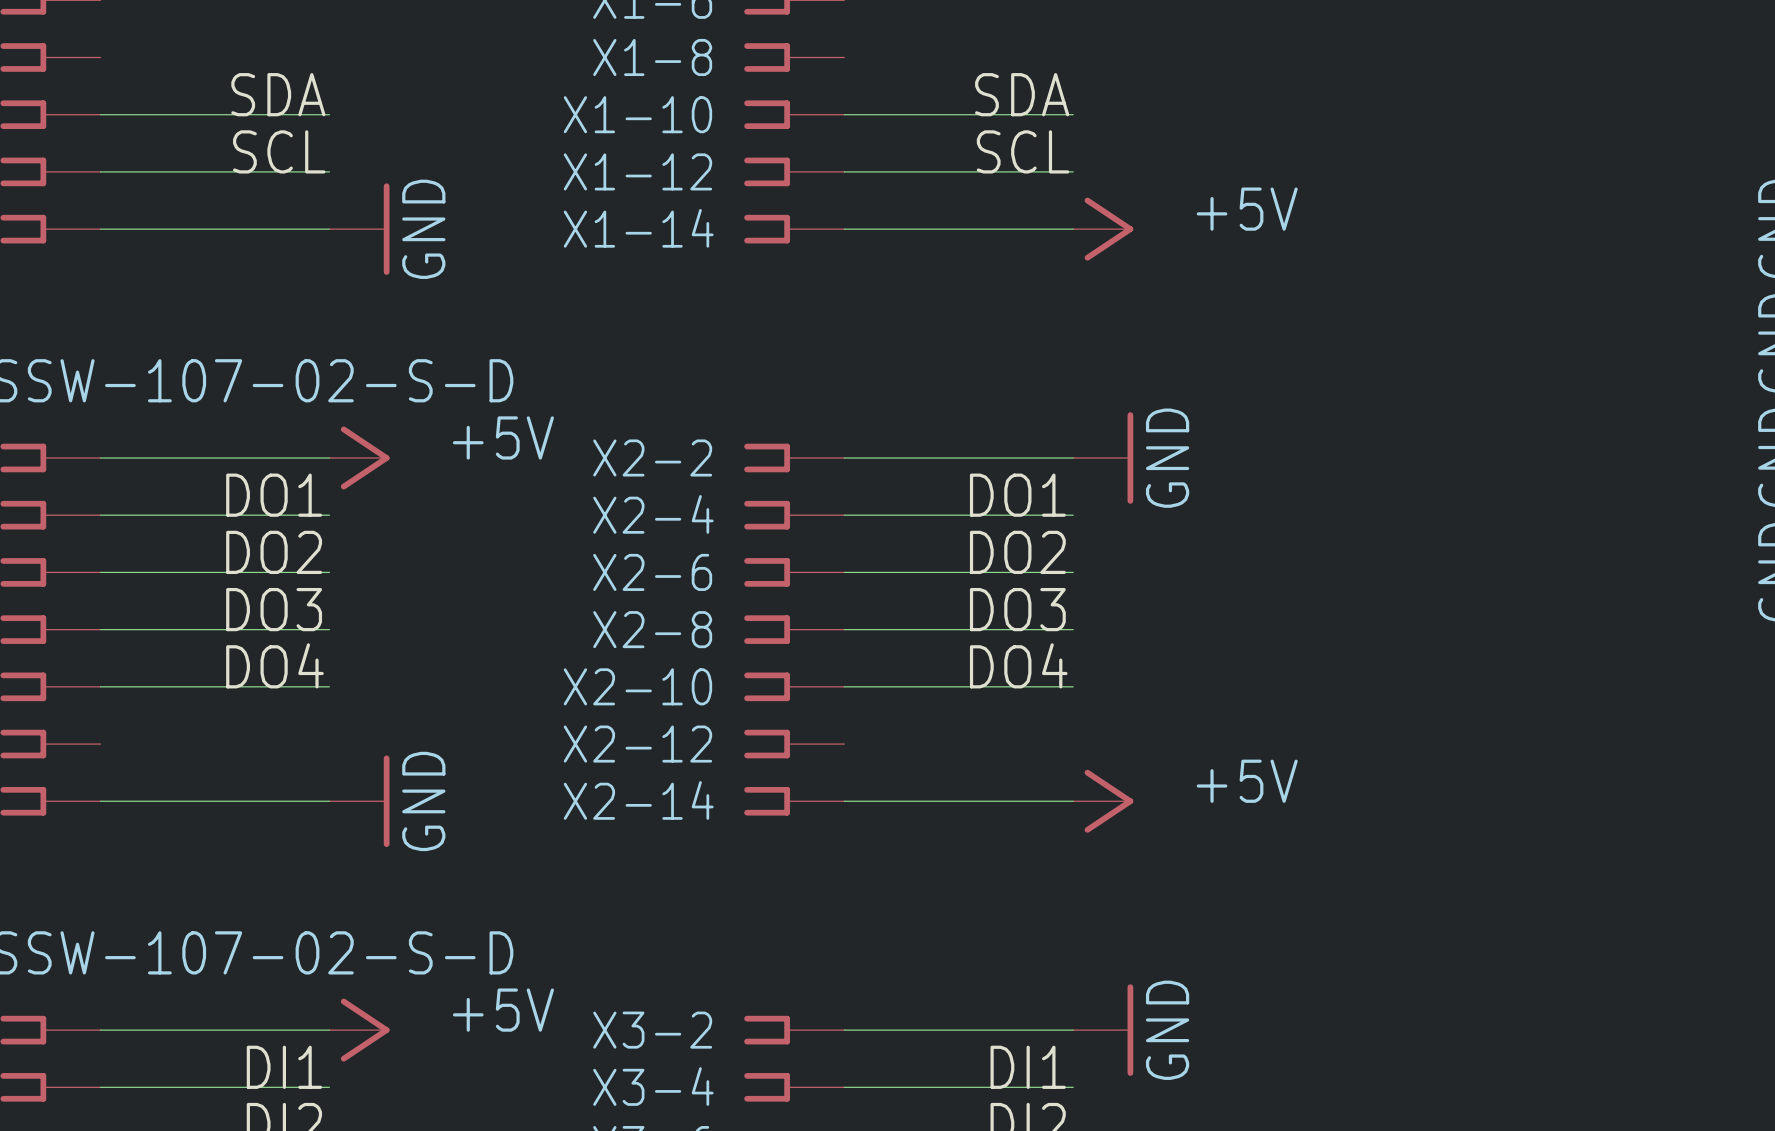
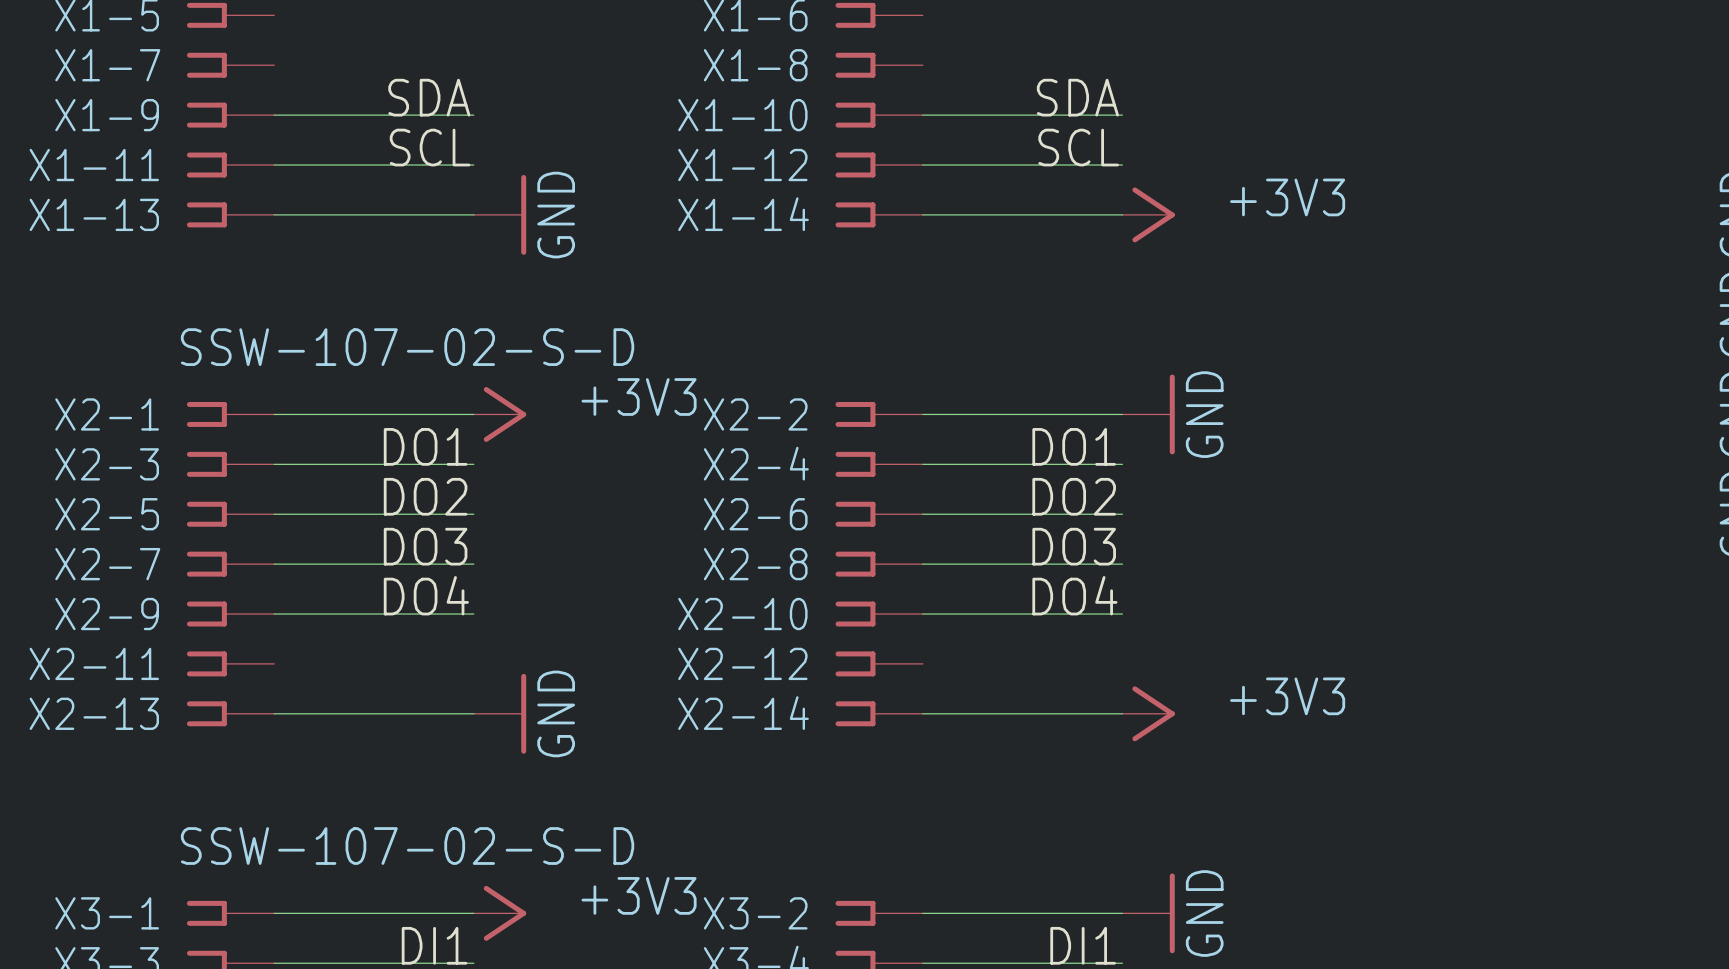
power symbol: +5V (1103, 229) -> +3V3 (1148, 214)
power symbol: +5V (359, 457) -> +3V3 (500, 414)
power symbol: +5V (1103, 801) -> +3V3 (1148, 713)
power symbol: +5V (359, 1030) -> +3V3 (500, 913)

